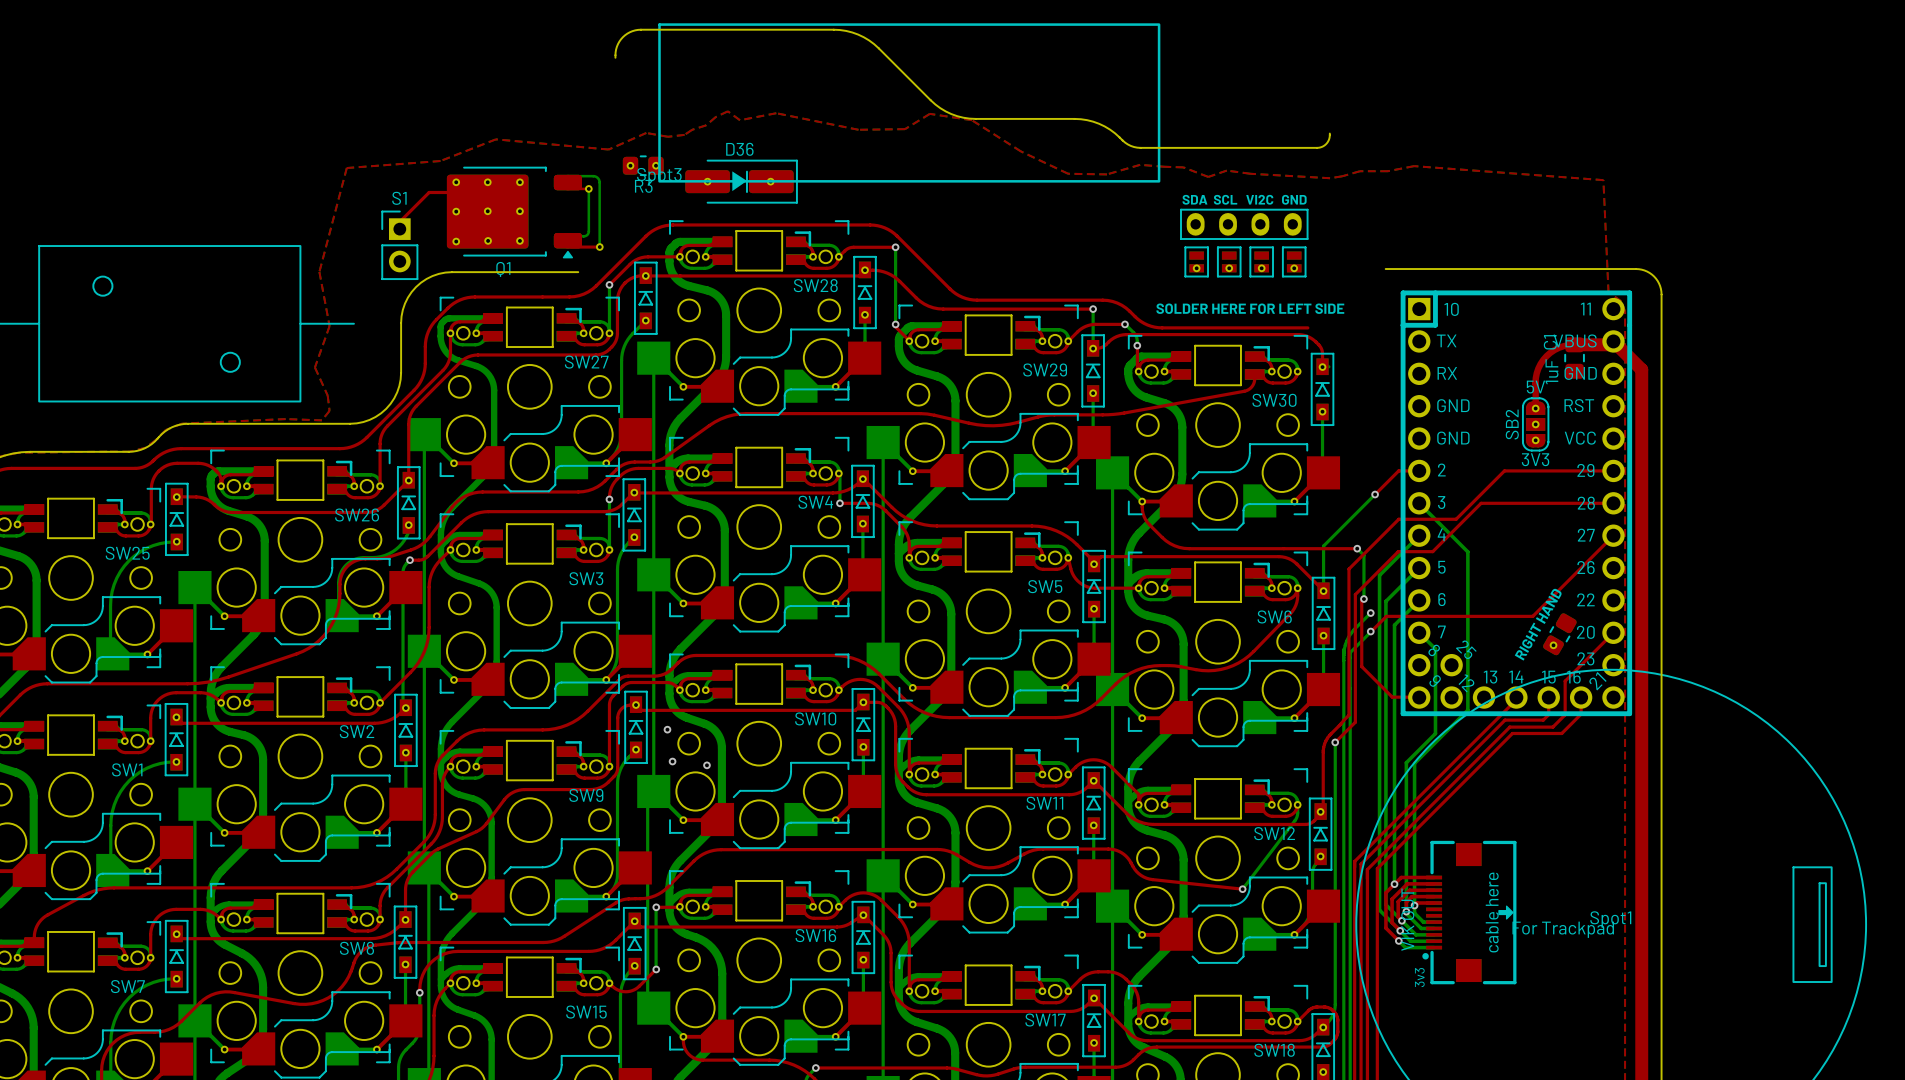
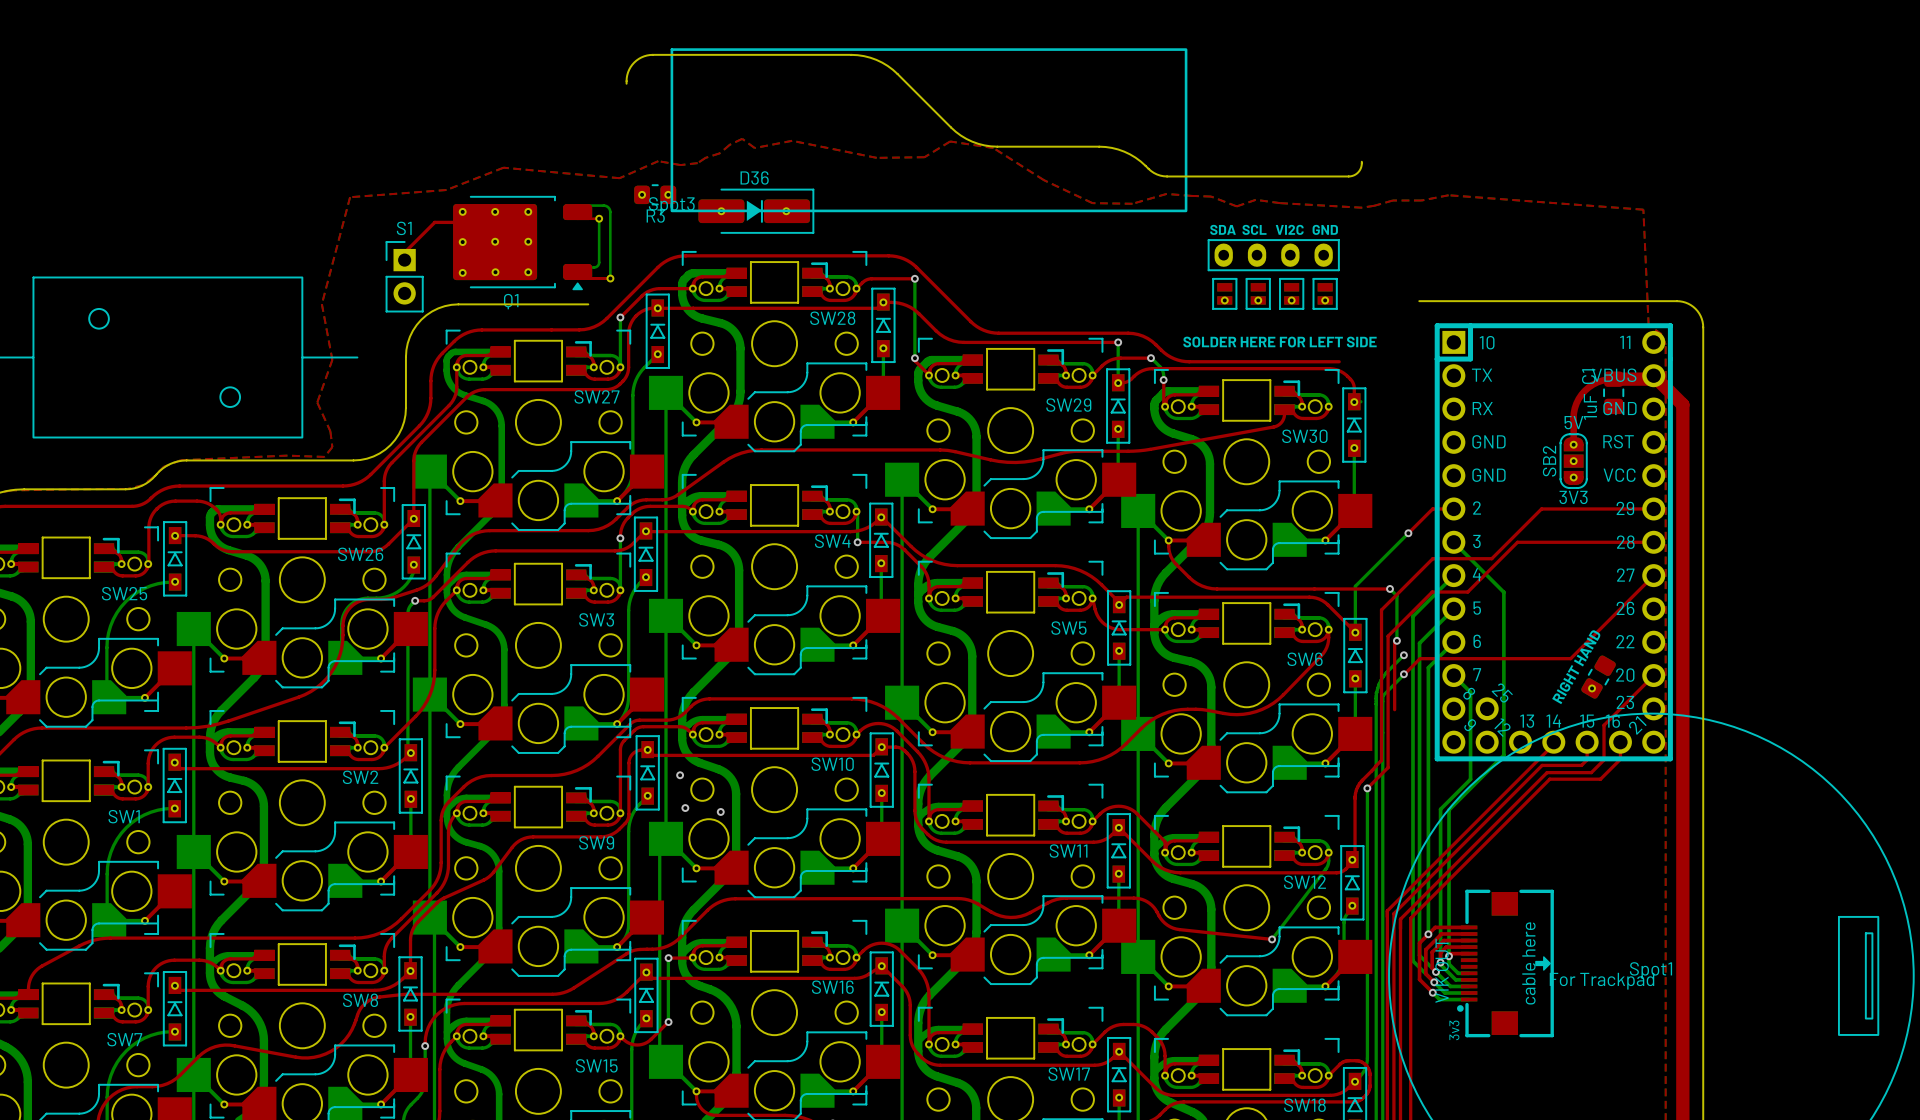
top track: (1361, 665) (1392, 697) (1419, 697) -> none

